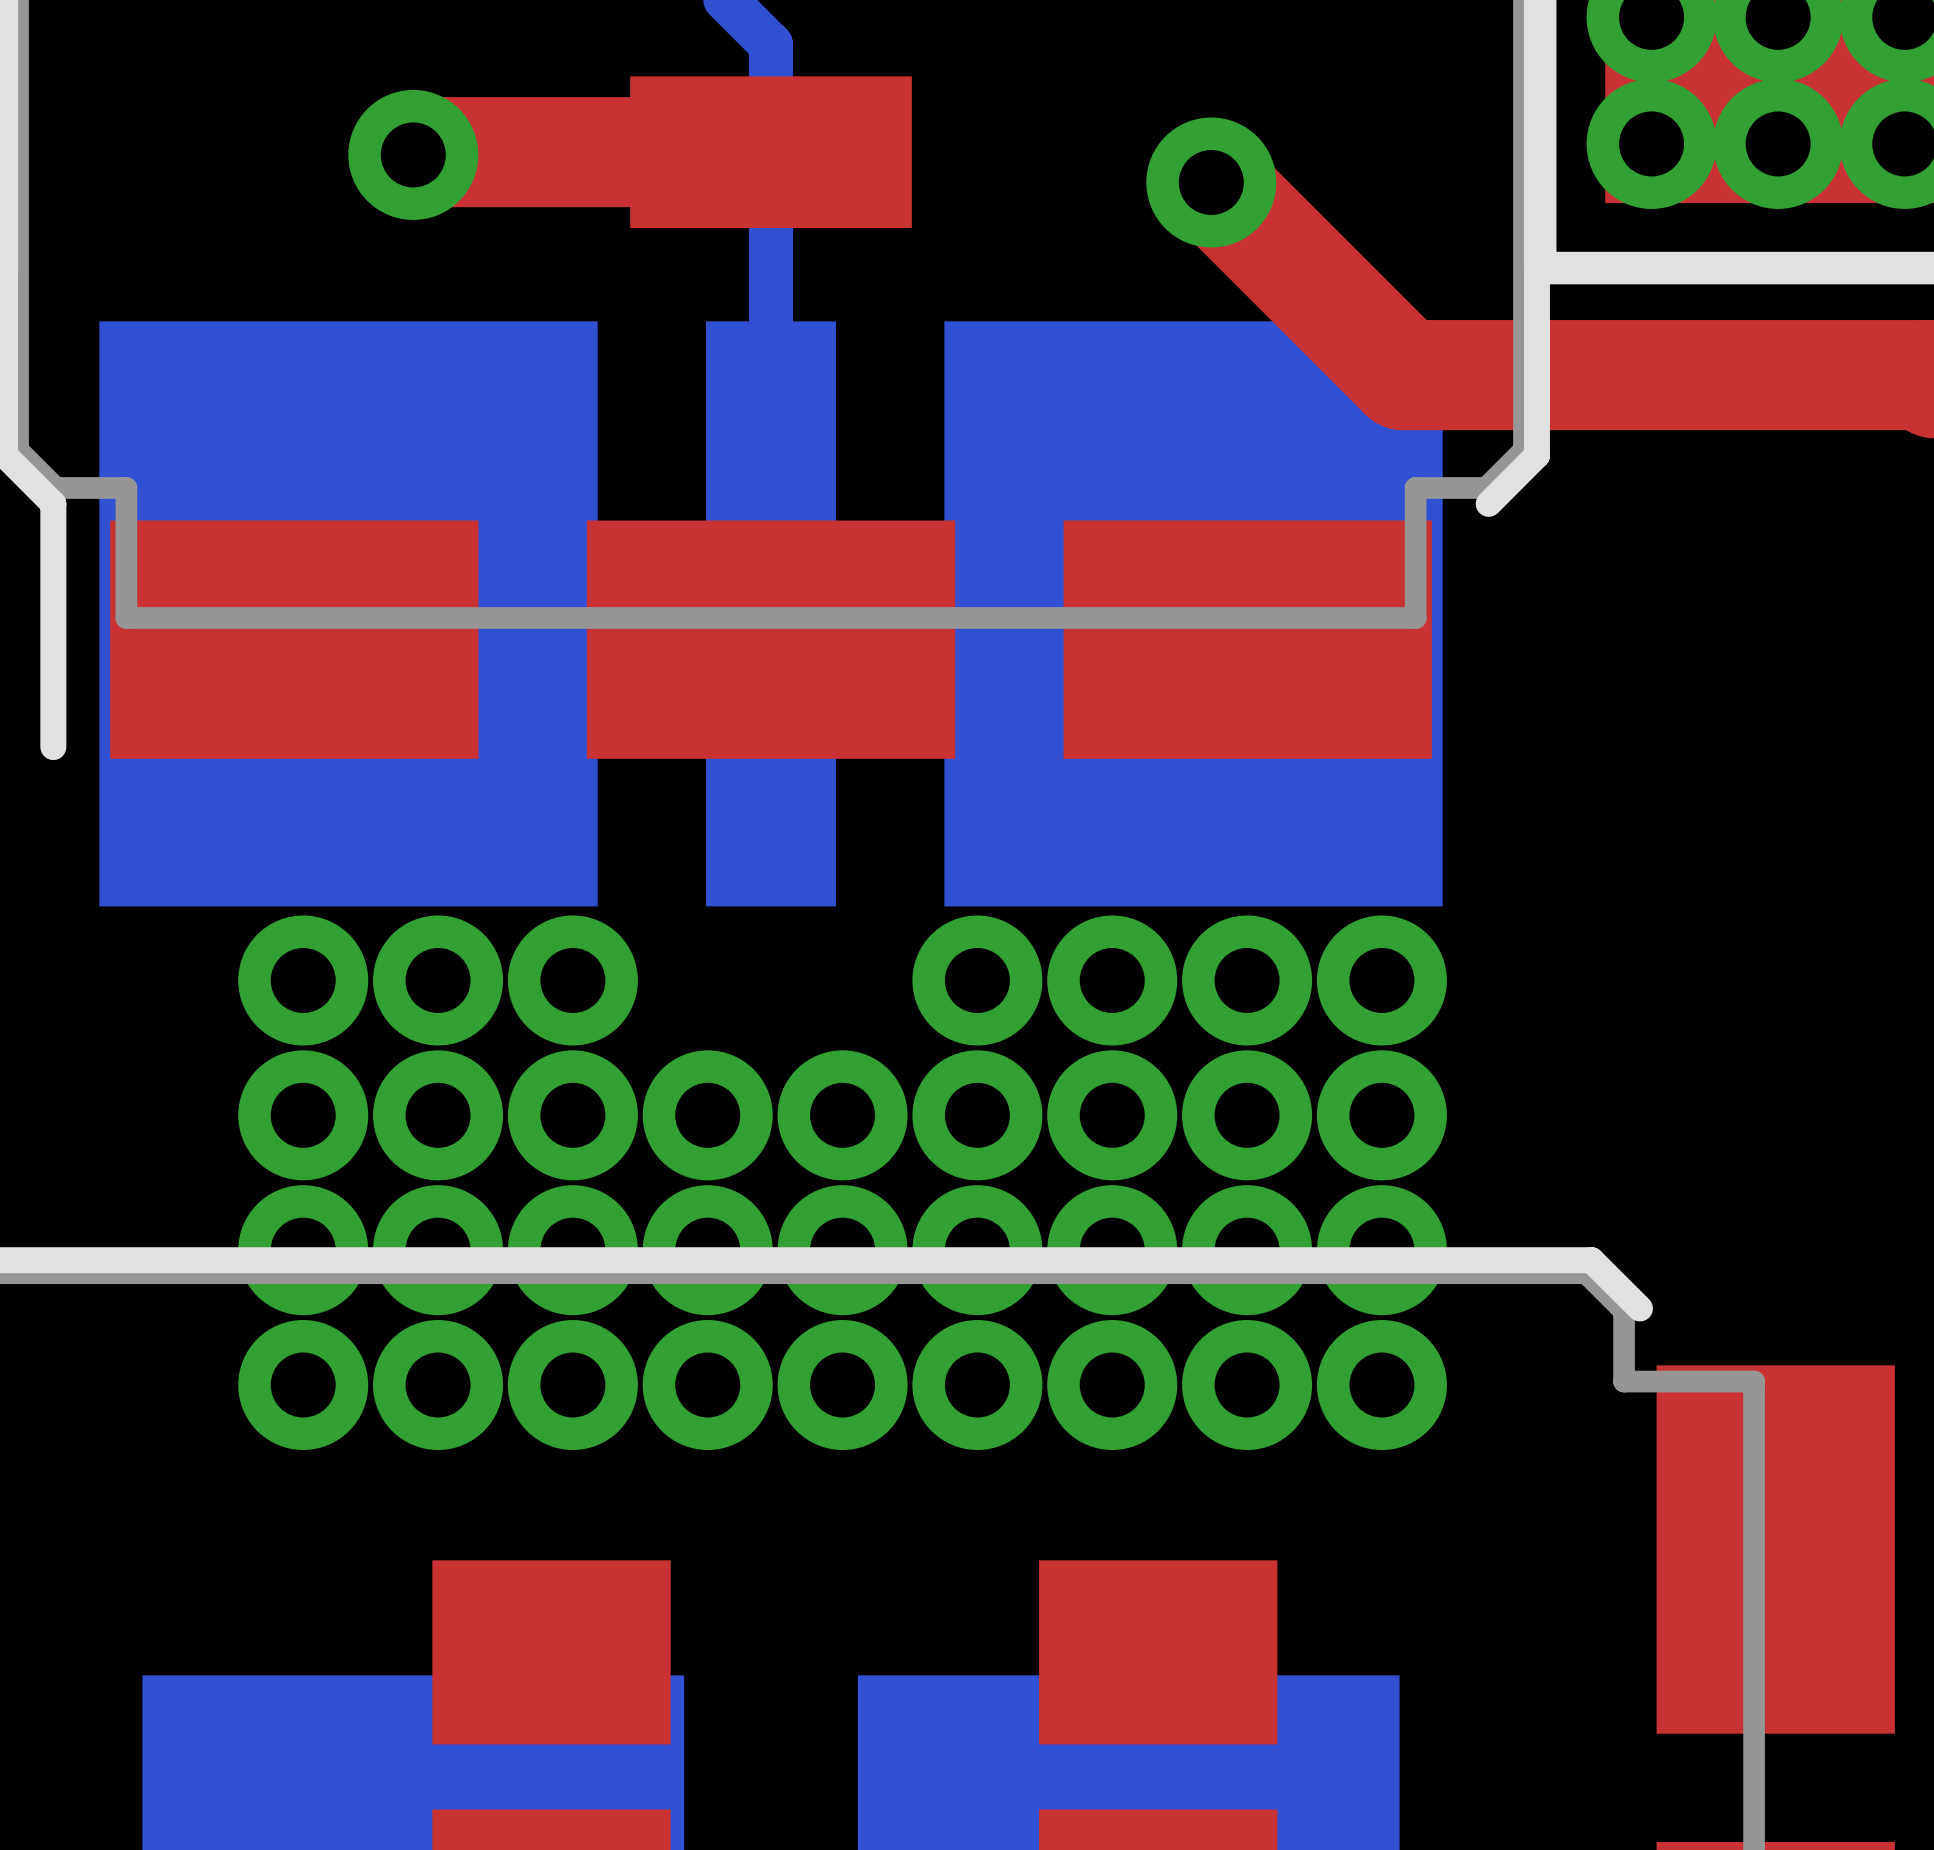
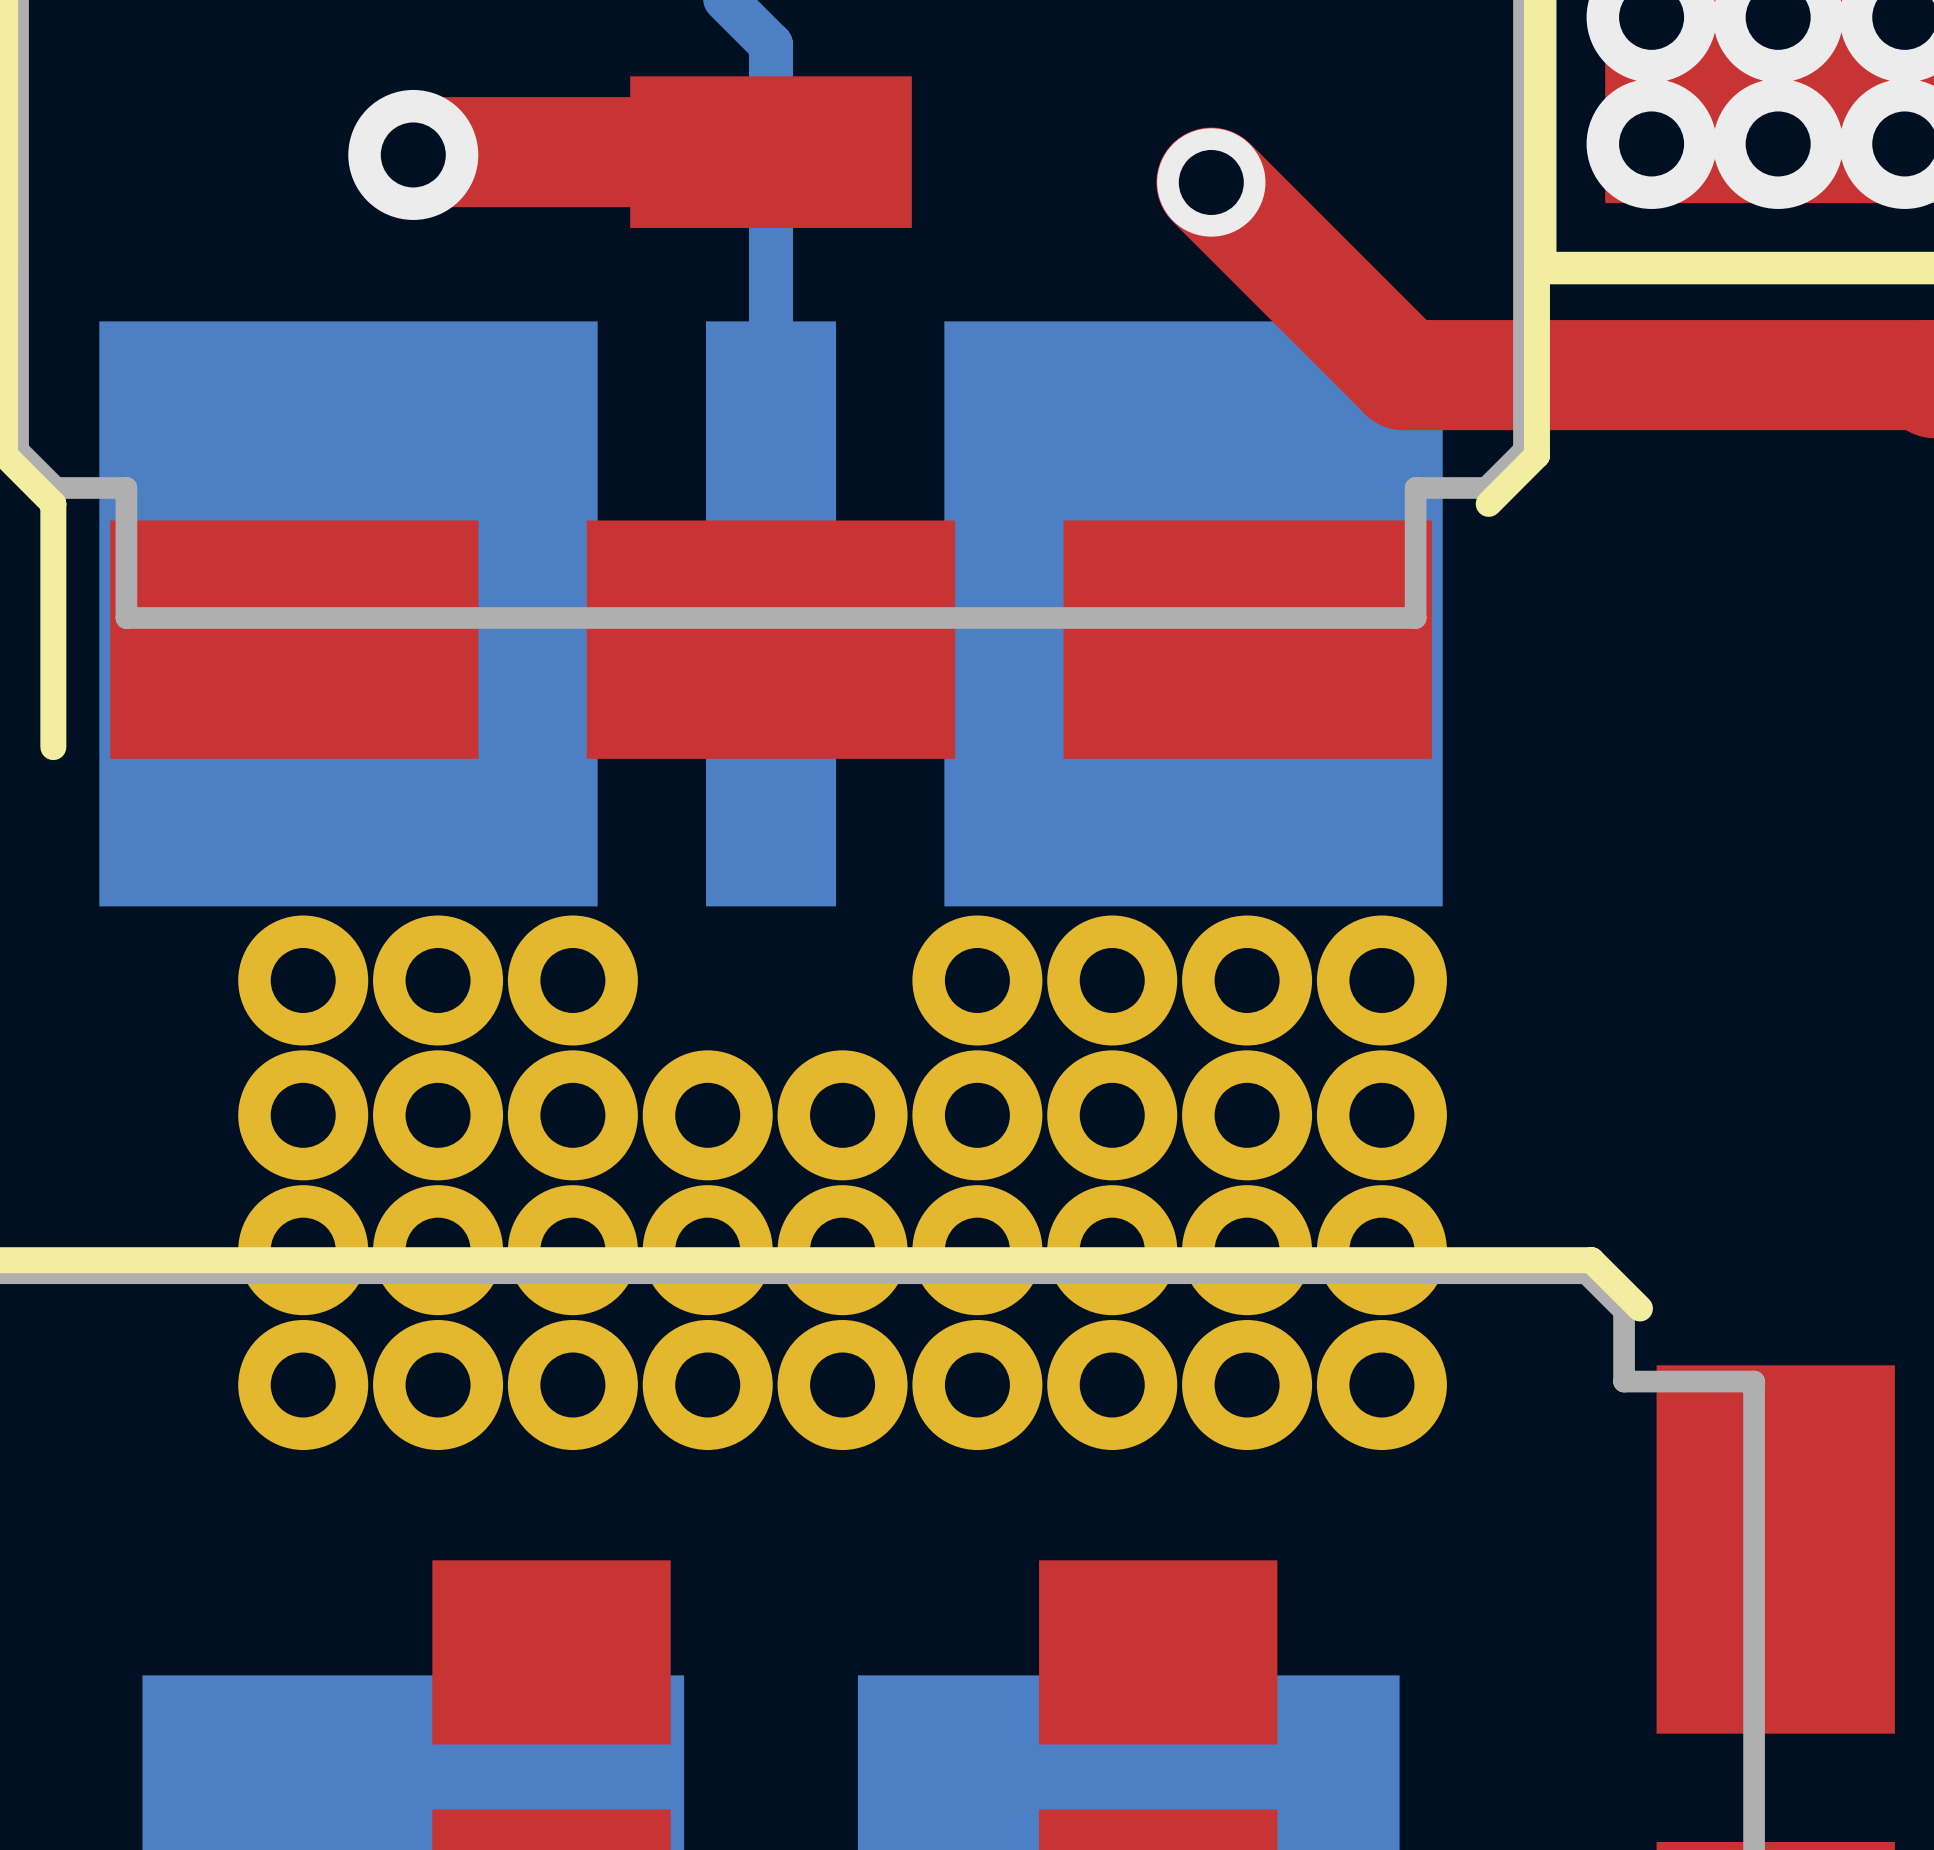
via size: [1146, 117, 1277, 248] -> [1157, 128, 1266, 237]

